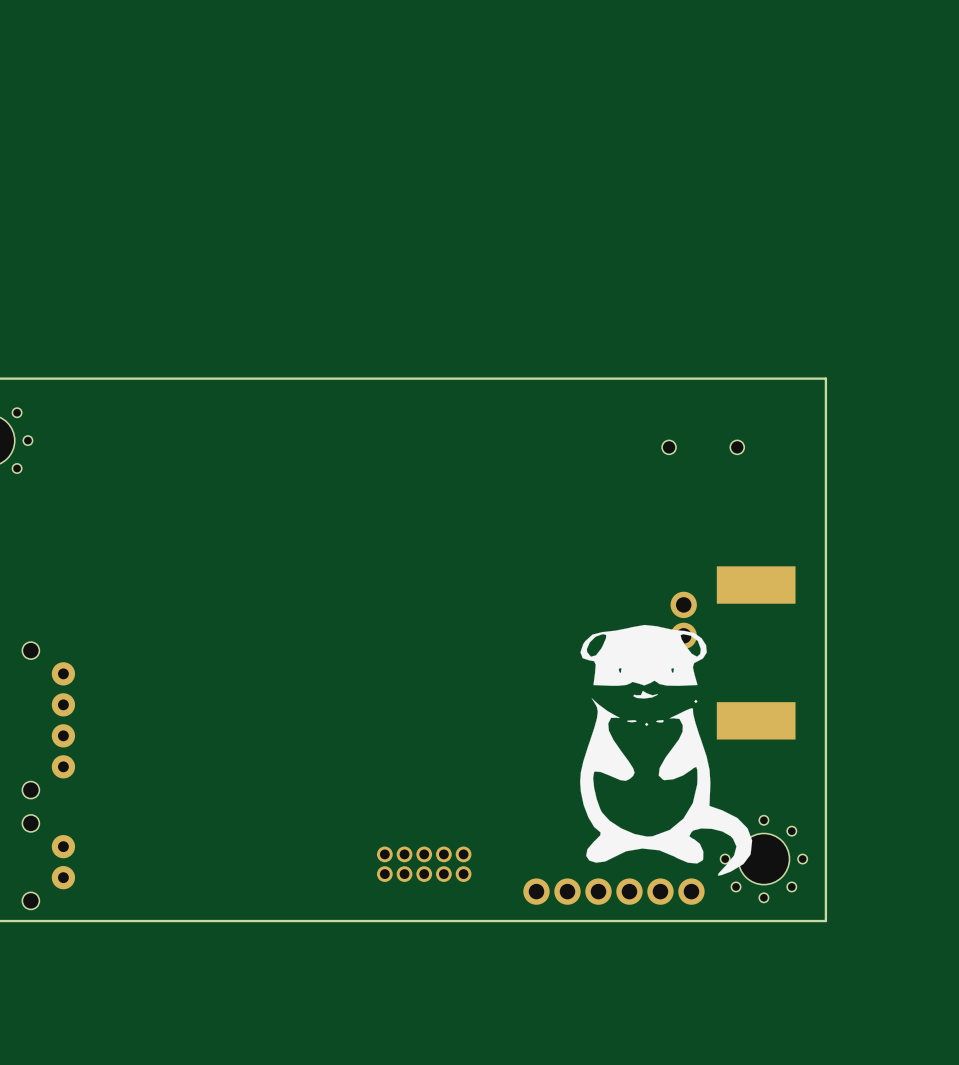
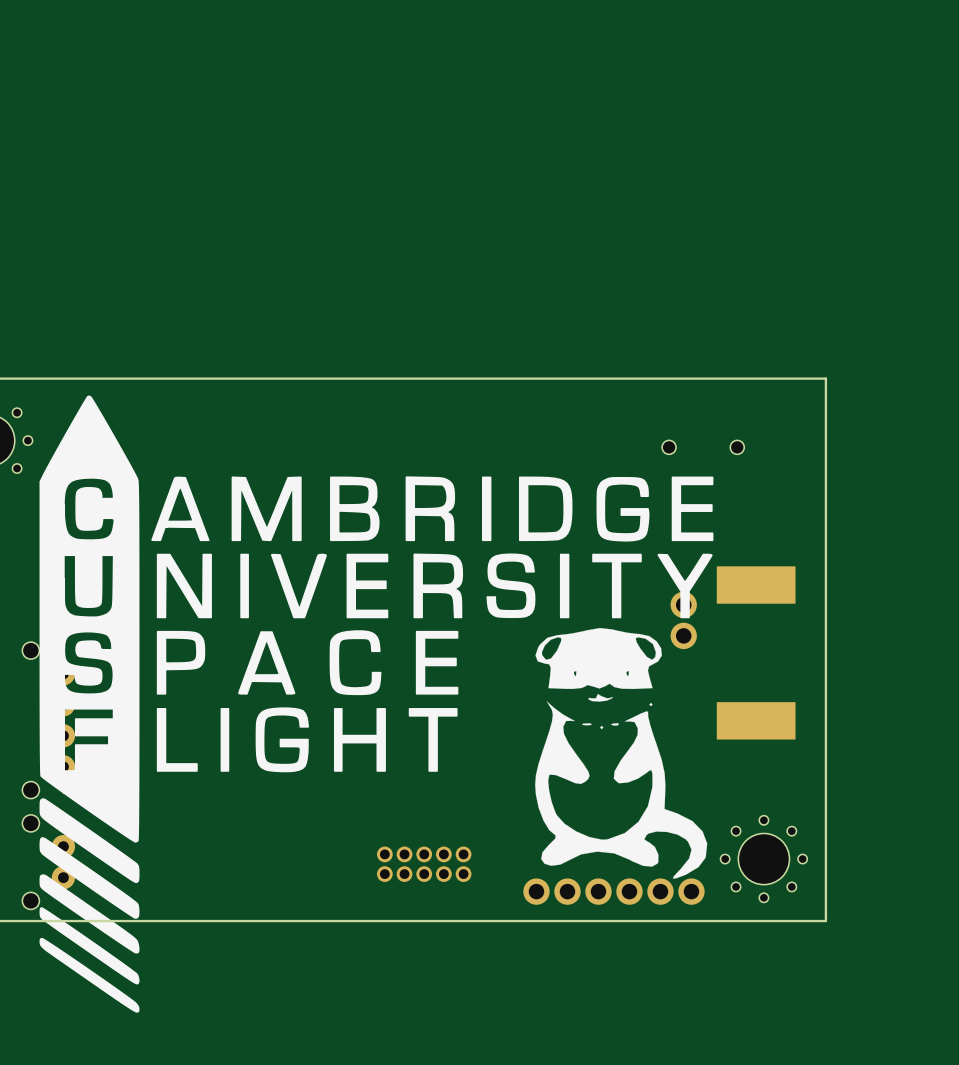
drawing: none -> [39, 395, 714, 1013]
drawing position: (666, 750) -> (621, 753)

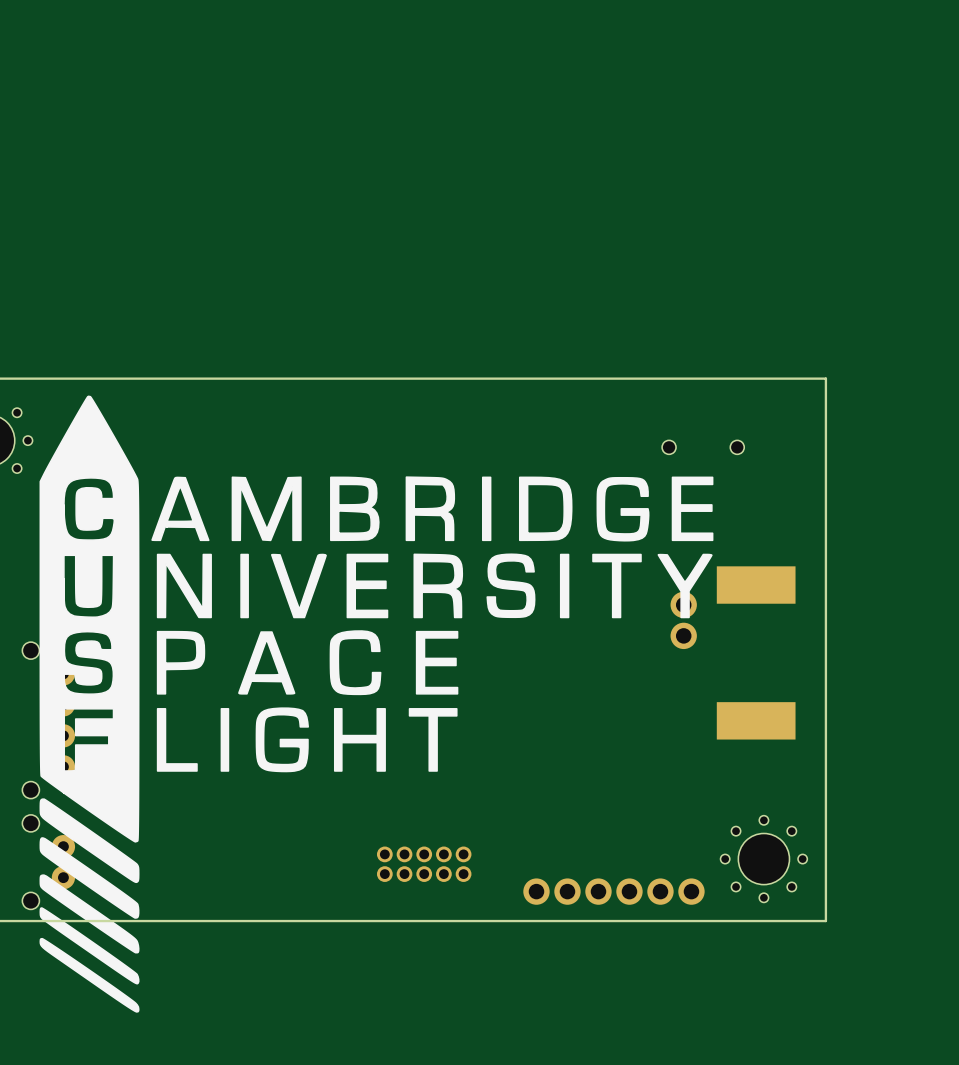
drawing: [535, 628, 708, 879] -> none

